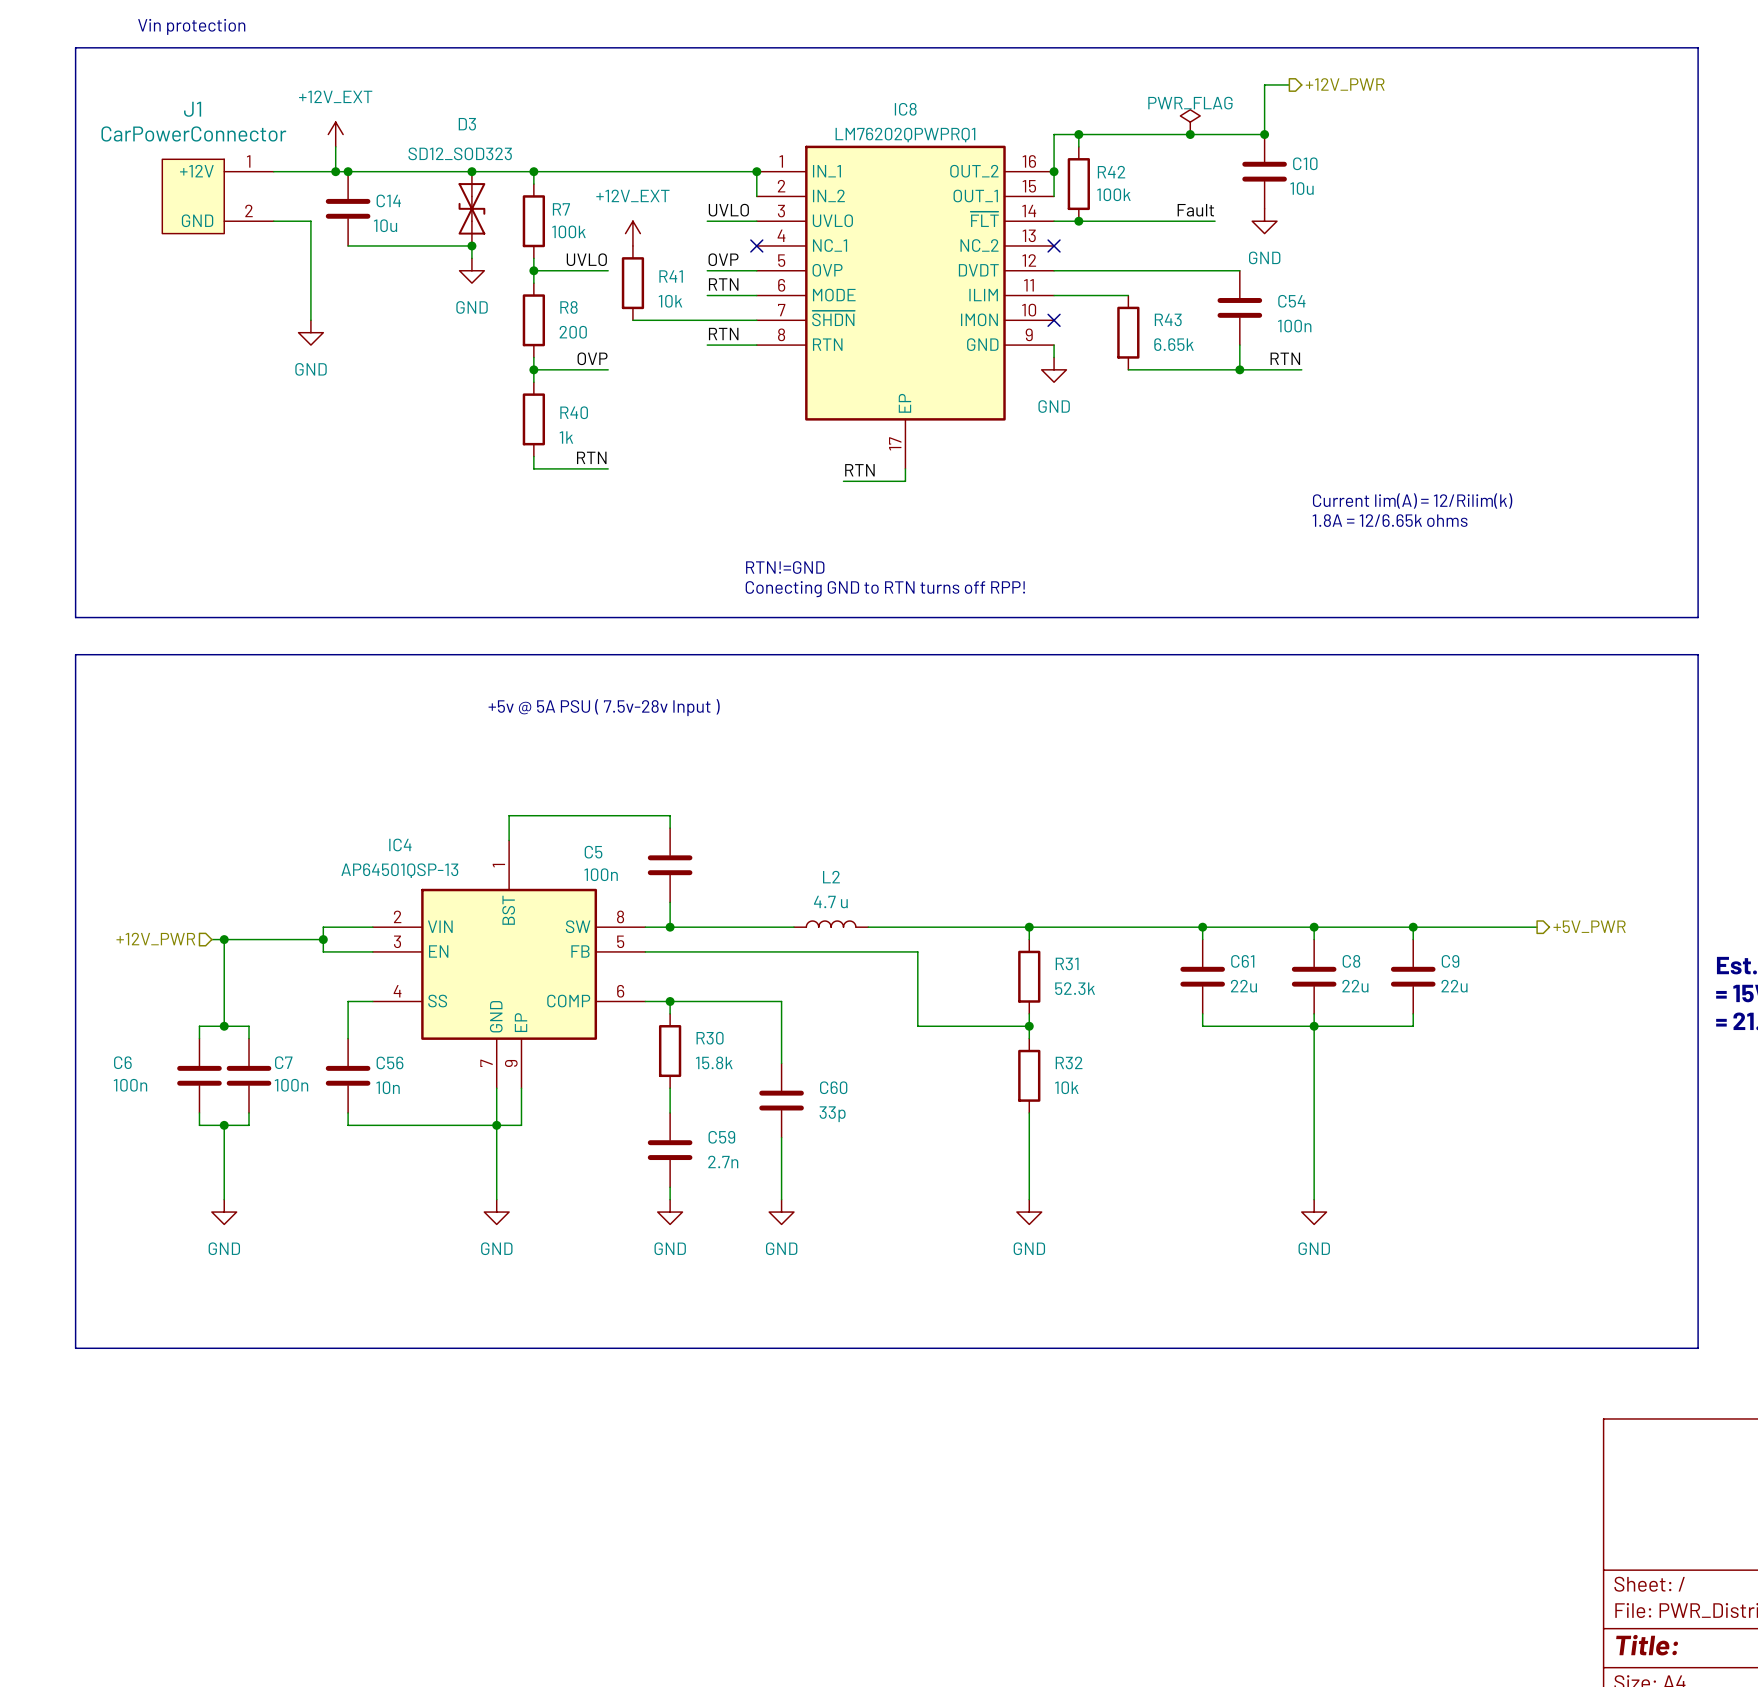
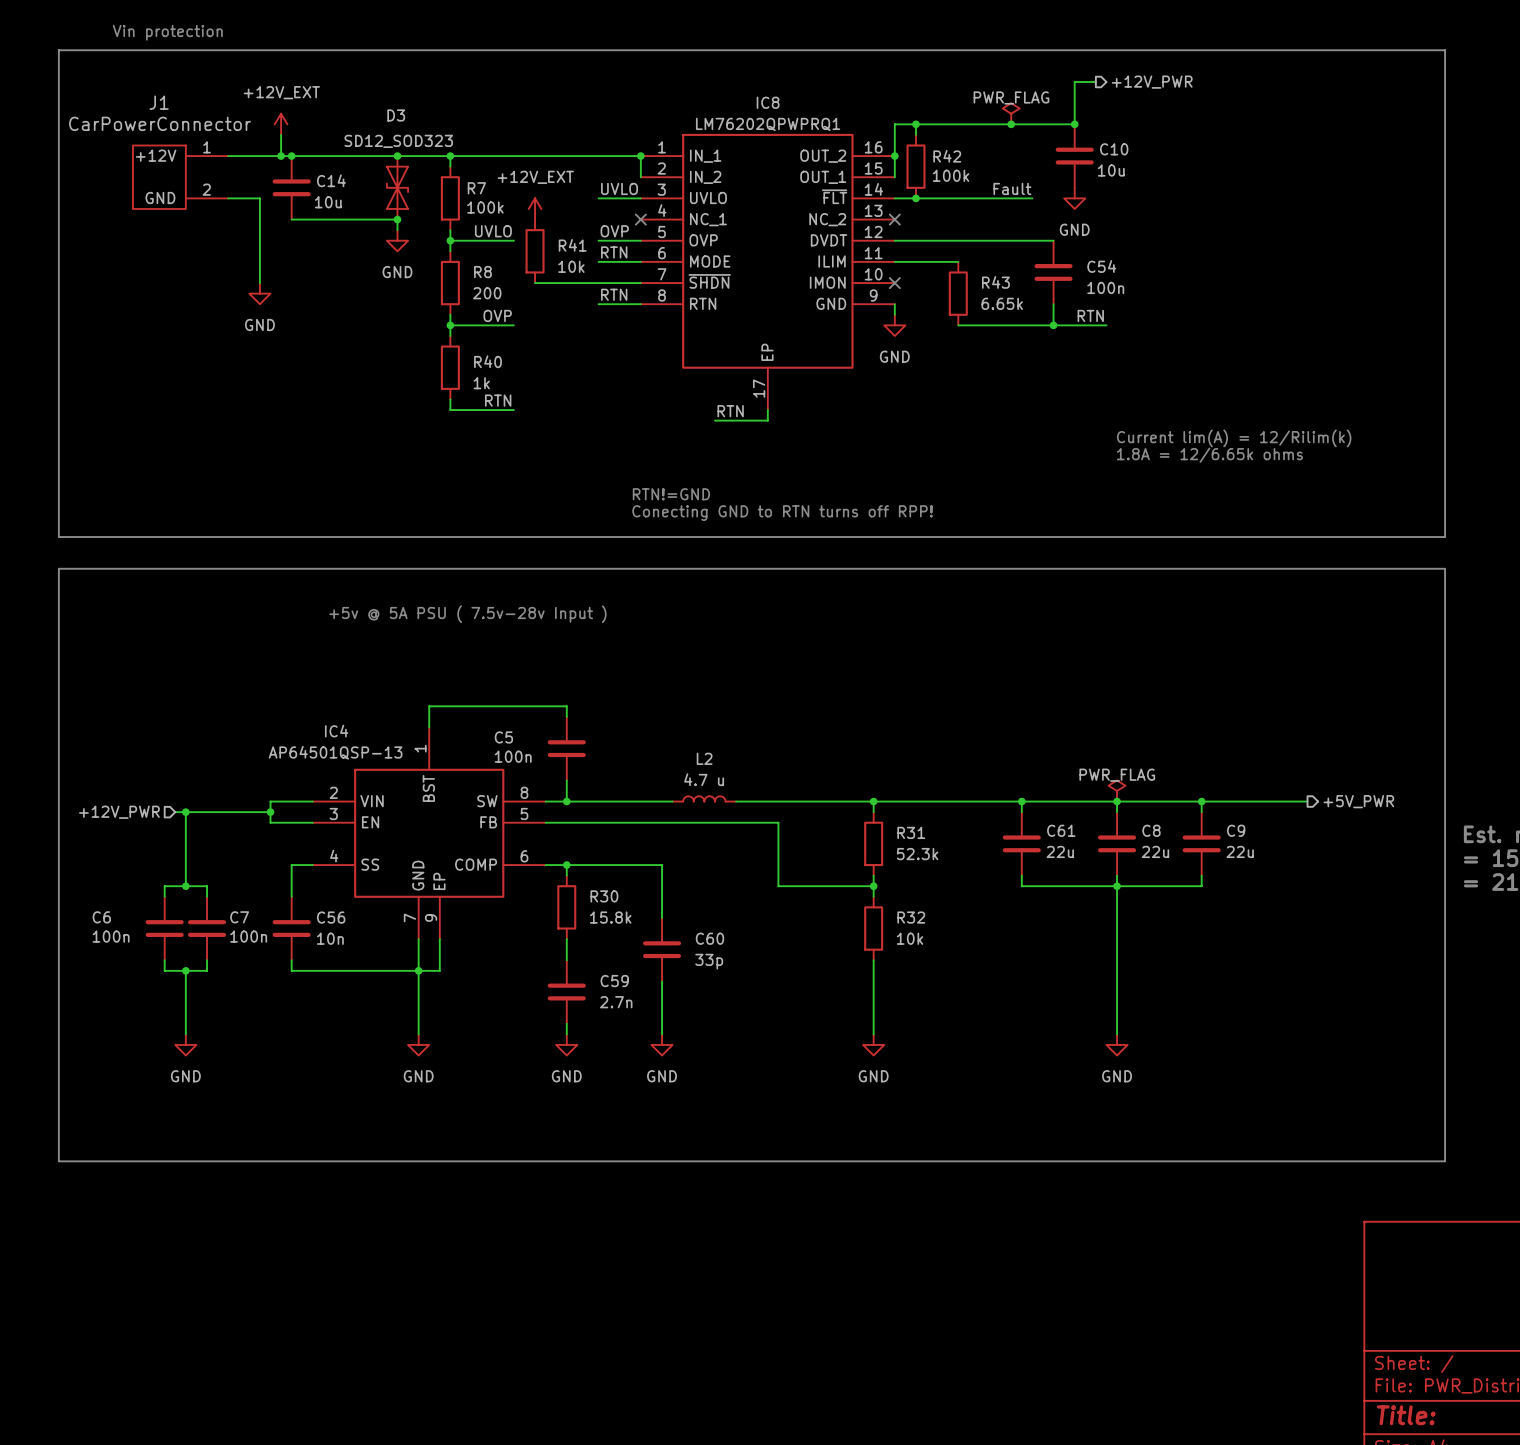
power symbol: none -> PWR_FLAG (1117, 790)

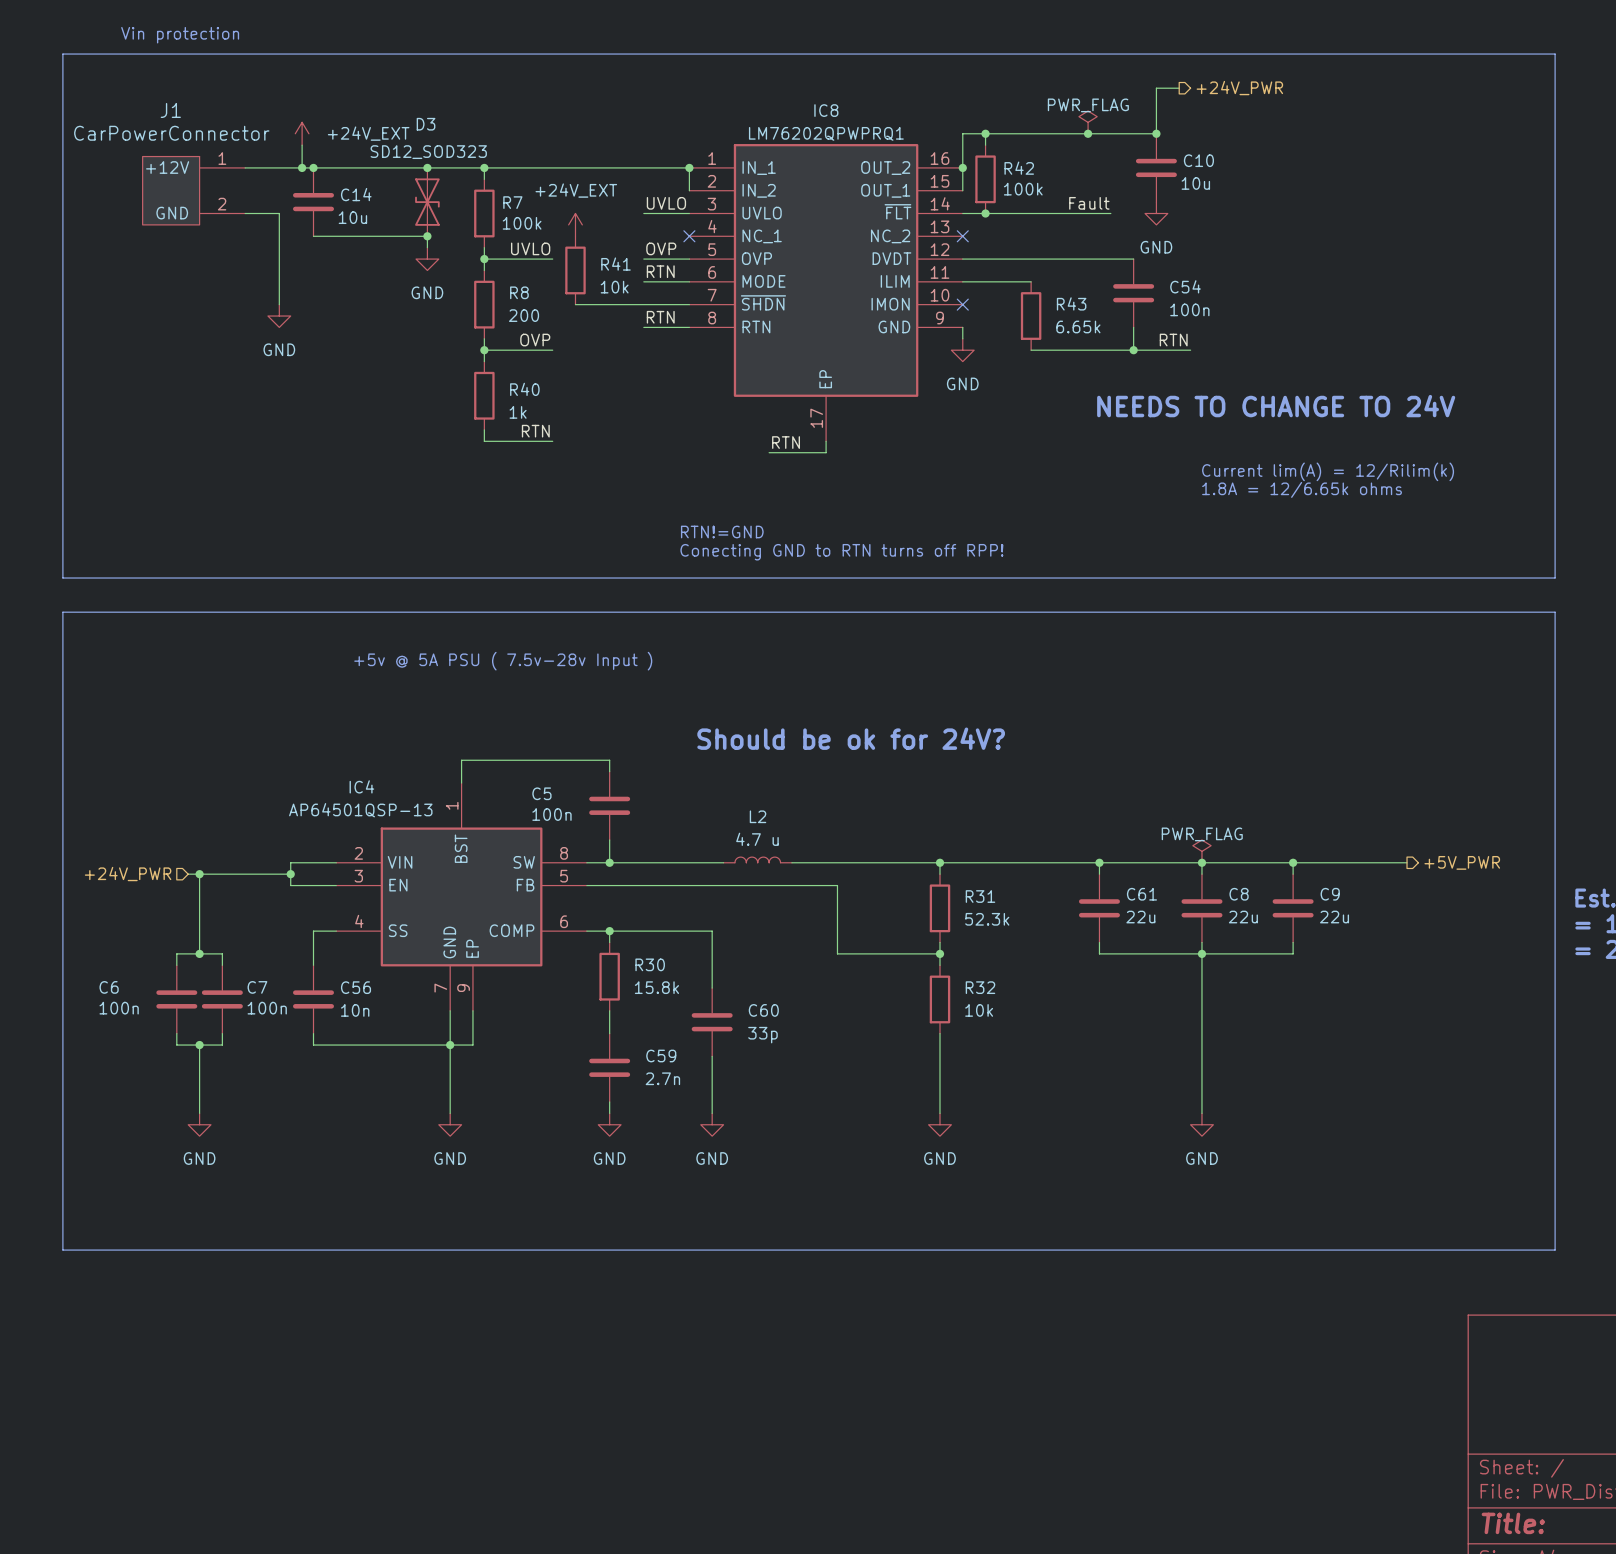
hierarchical label: +12V_PWR (1152, 82) -> +24V_PWR (1239, 88)
power symbol: +12V_EXT (281, 124) -> +24V_EXT (302, 133)
power symbol: +12V_EXT (535, 208) -> +24V_EXT (575, 224)
text: none -> NEEDS TO CHANGE TO 24V (1276, 406)
text: none -> Should be ok for 24V? (851, 738)
hierarchical label: +12V_PWR (119, 812) -> +24V_PWR (128, 874)

